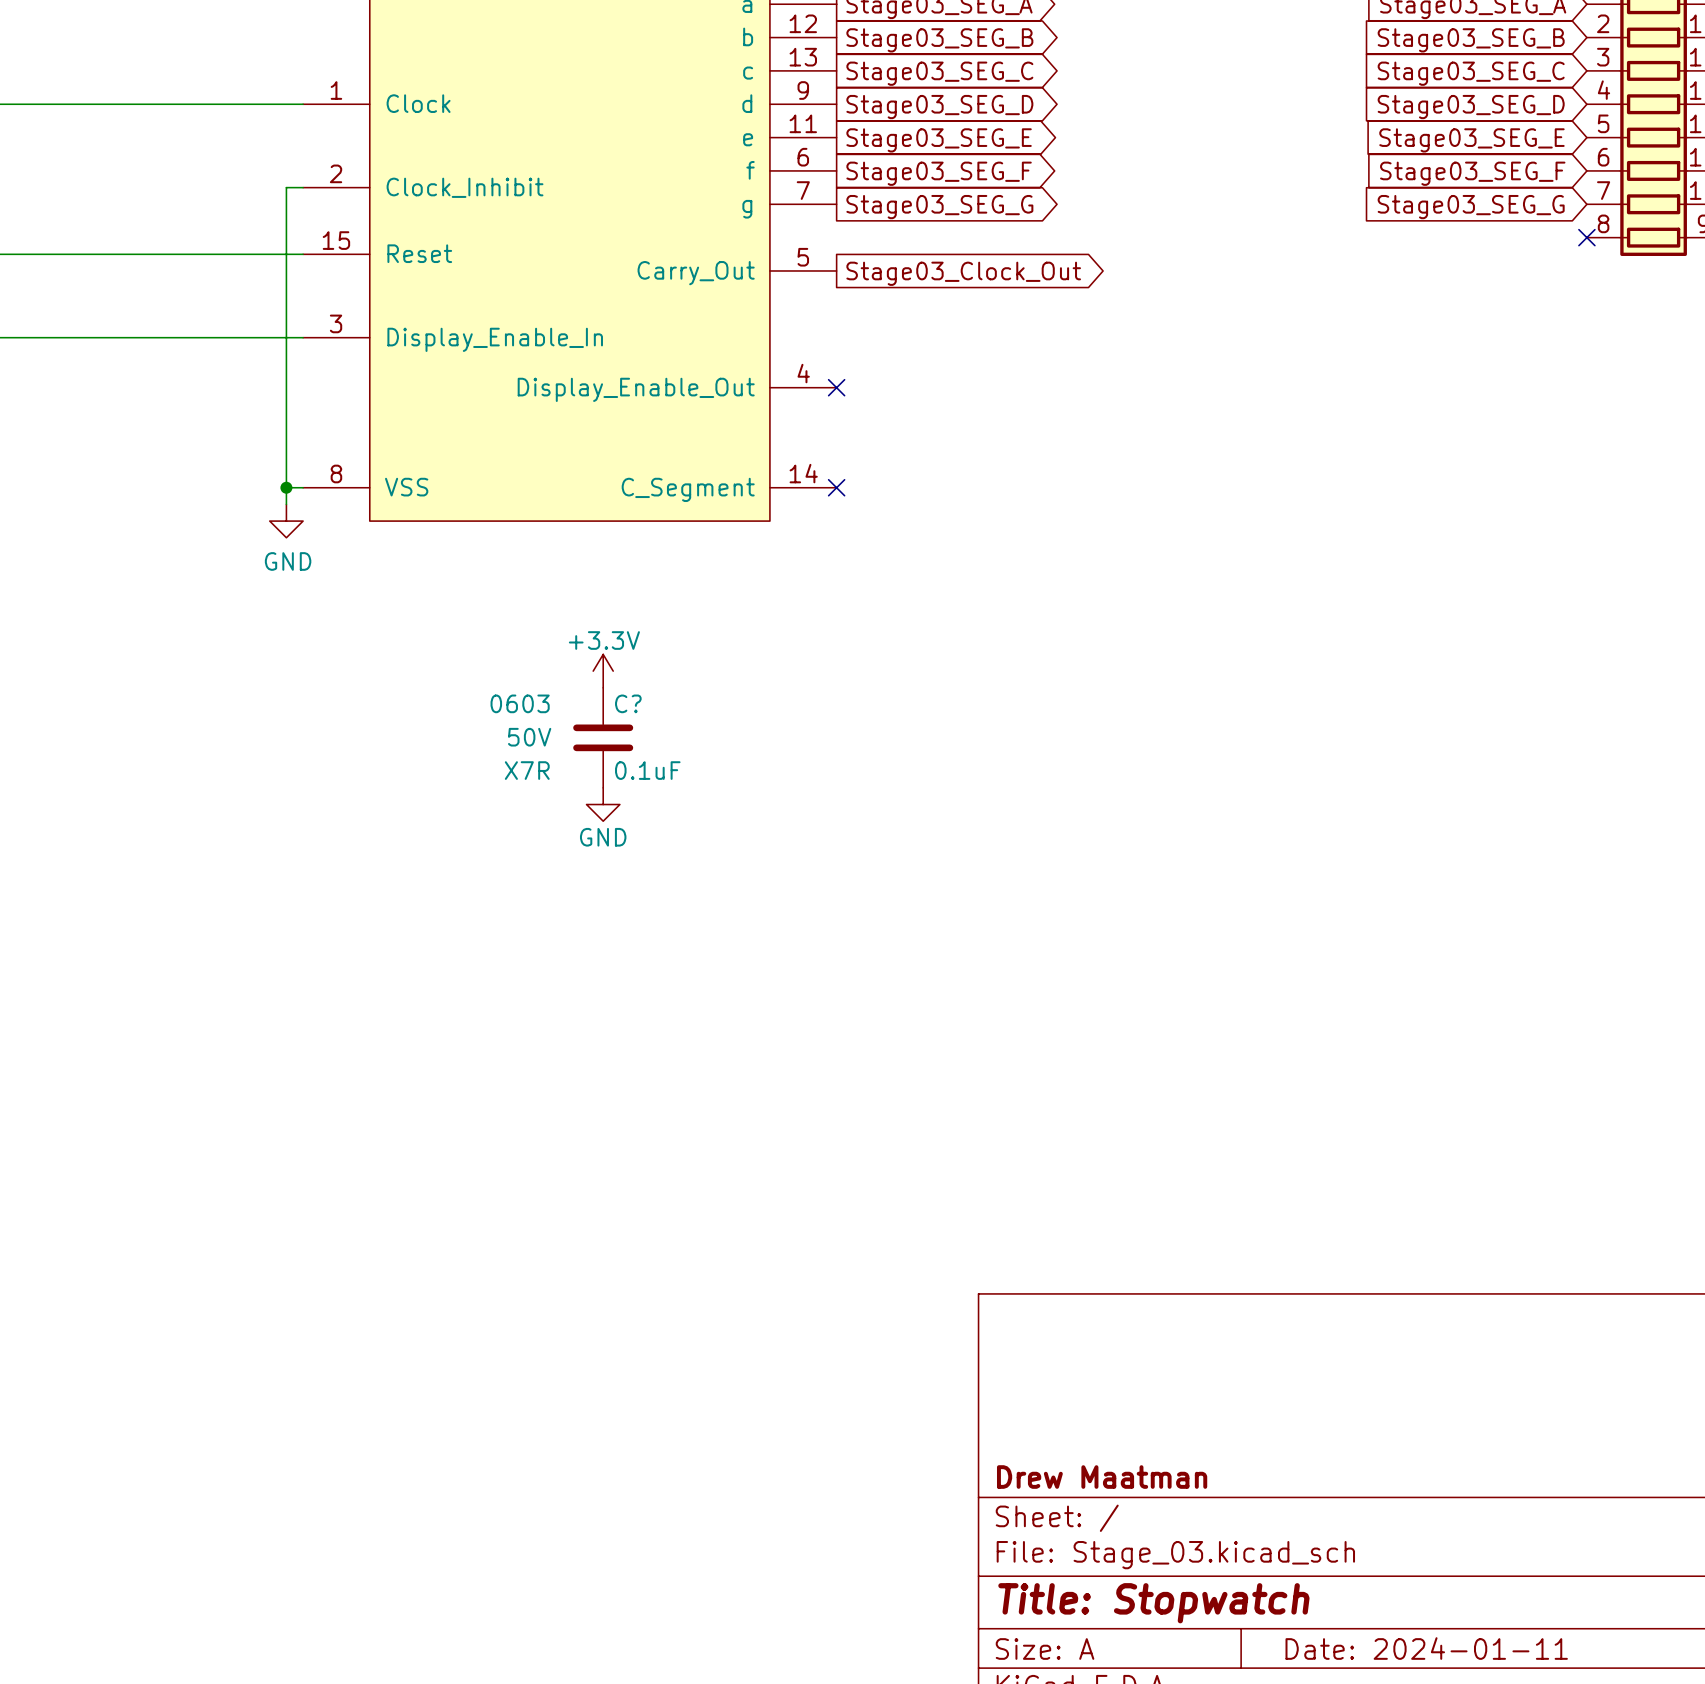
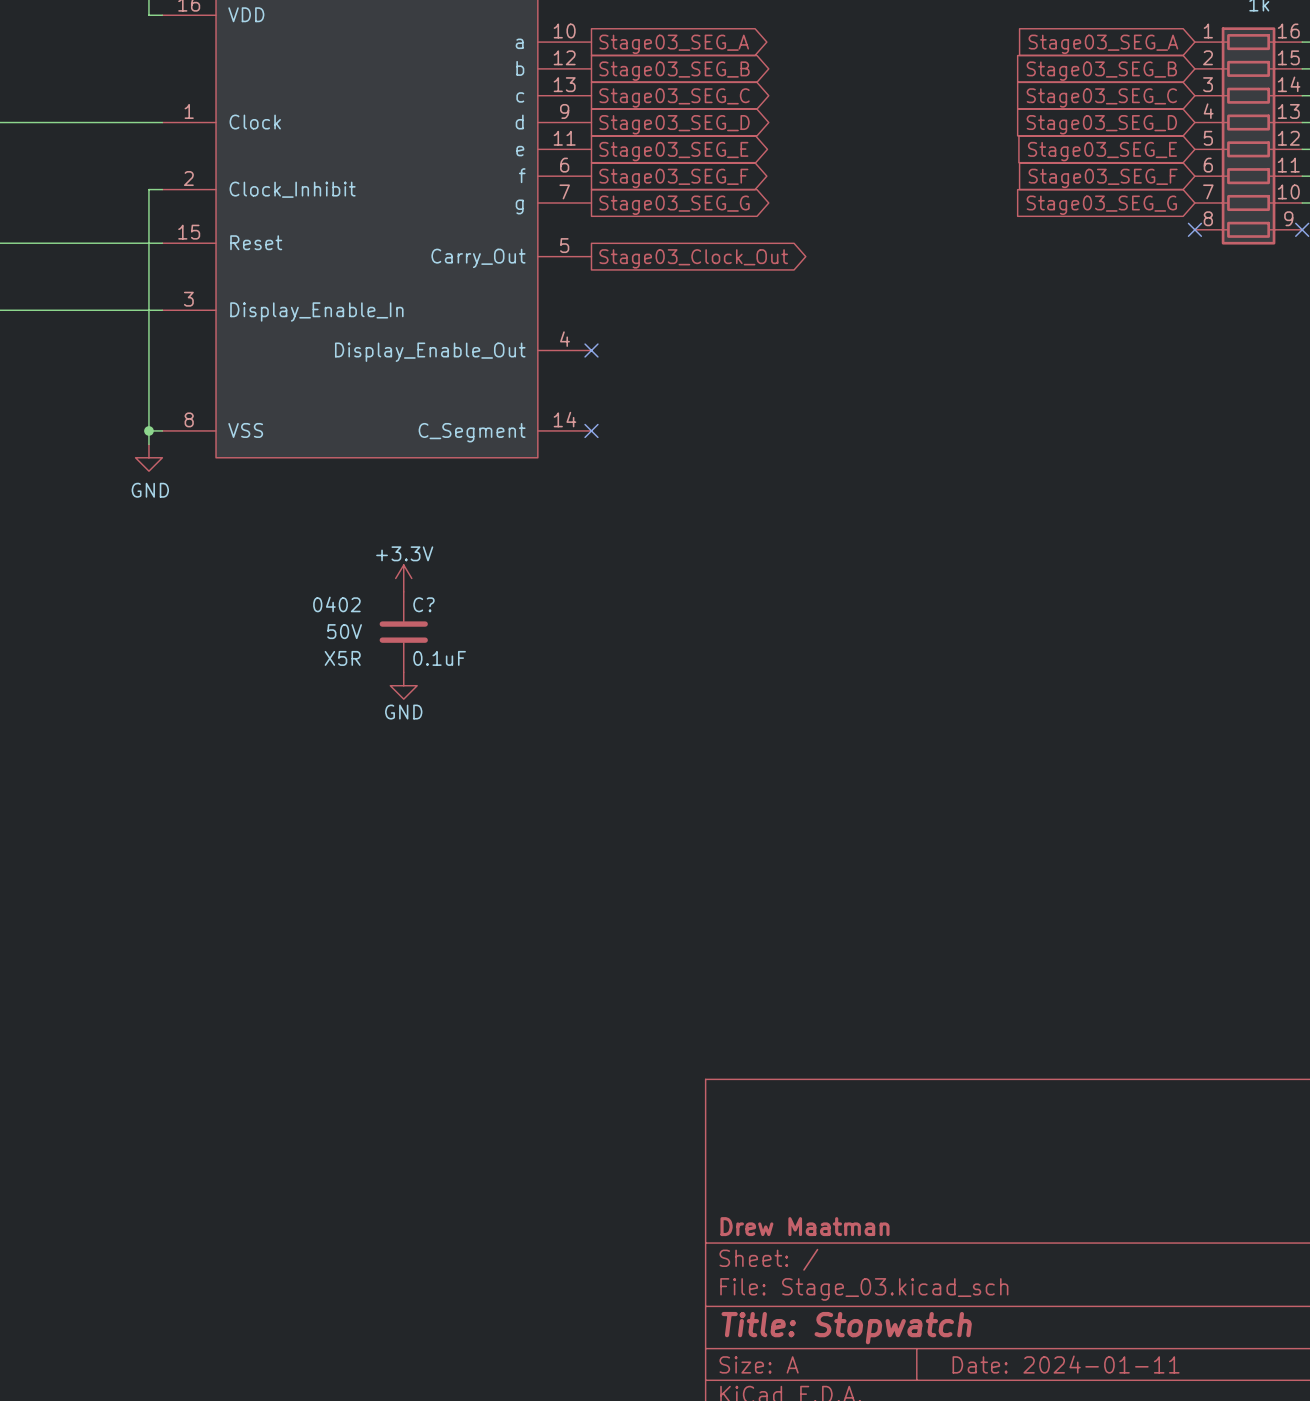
C? text: 0603 (520, 703) -> 0402 (336, 604)
C? text: X7R (527, 770) -> X5R (342, 658)

